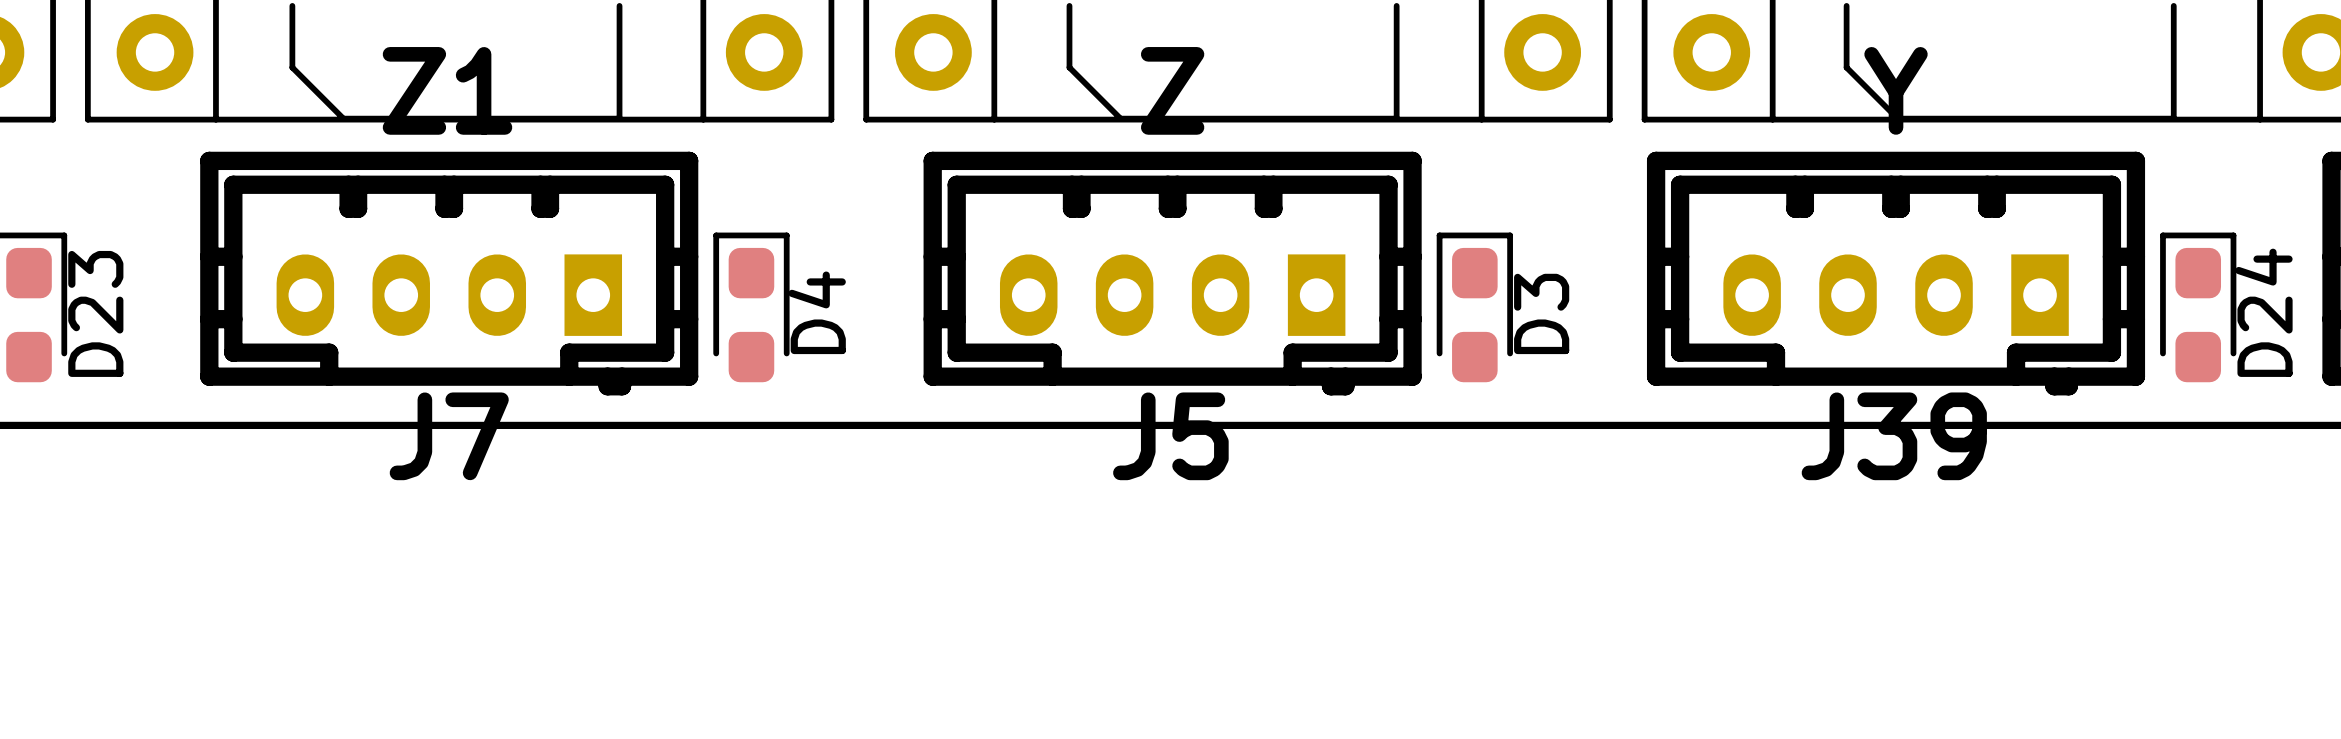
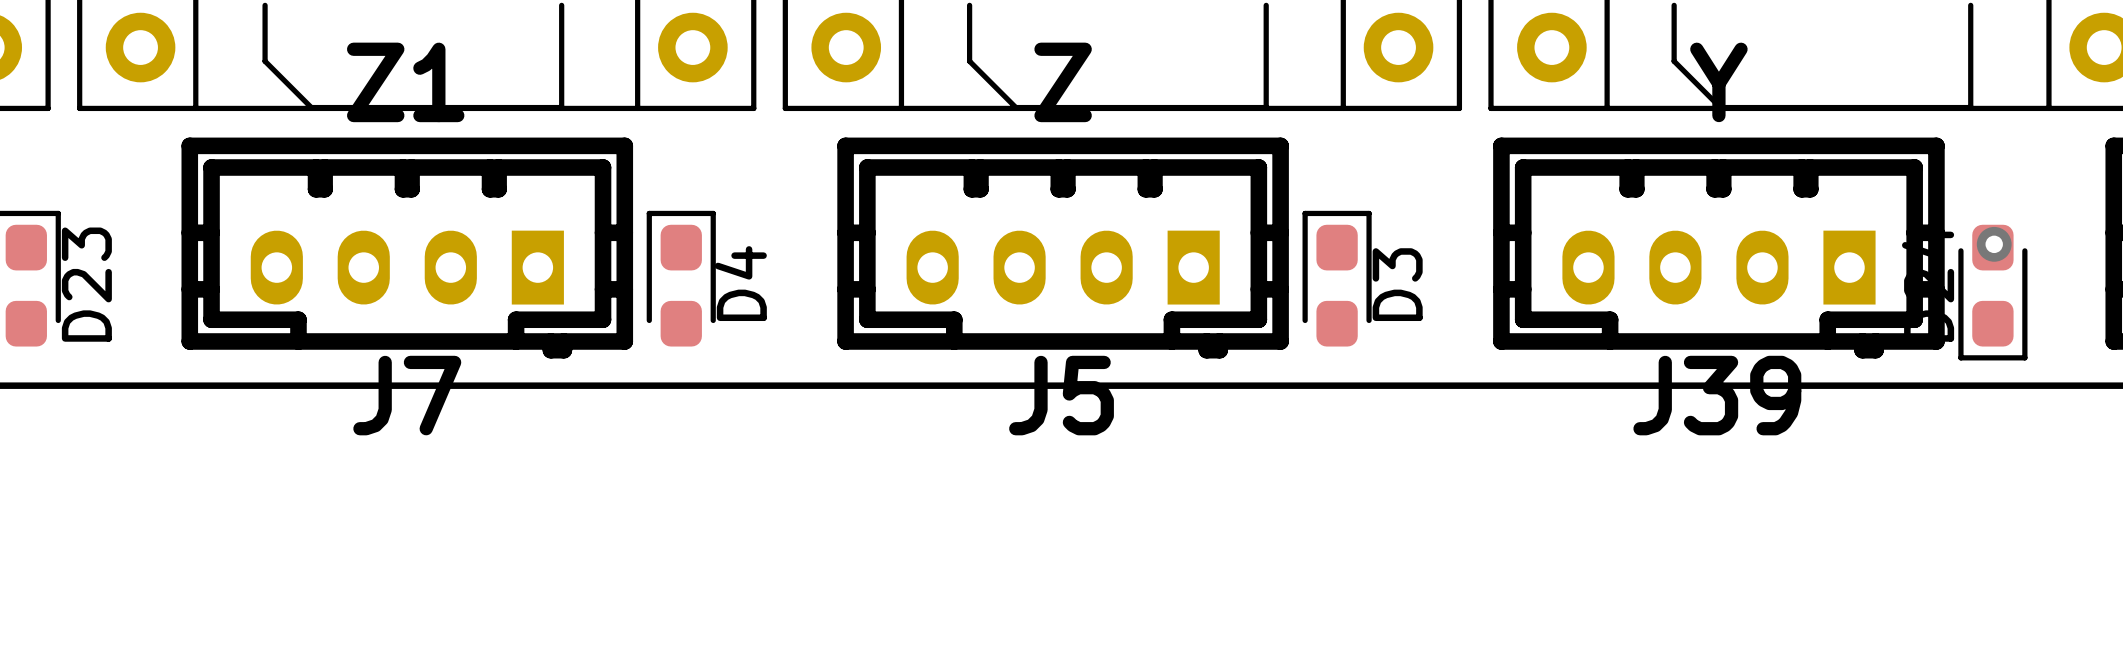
via: none -> (1994, 244)
D24 rotation: 0° (2198, 307) -> 180° (1992, 292)

